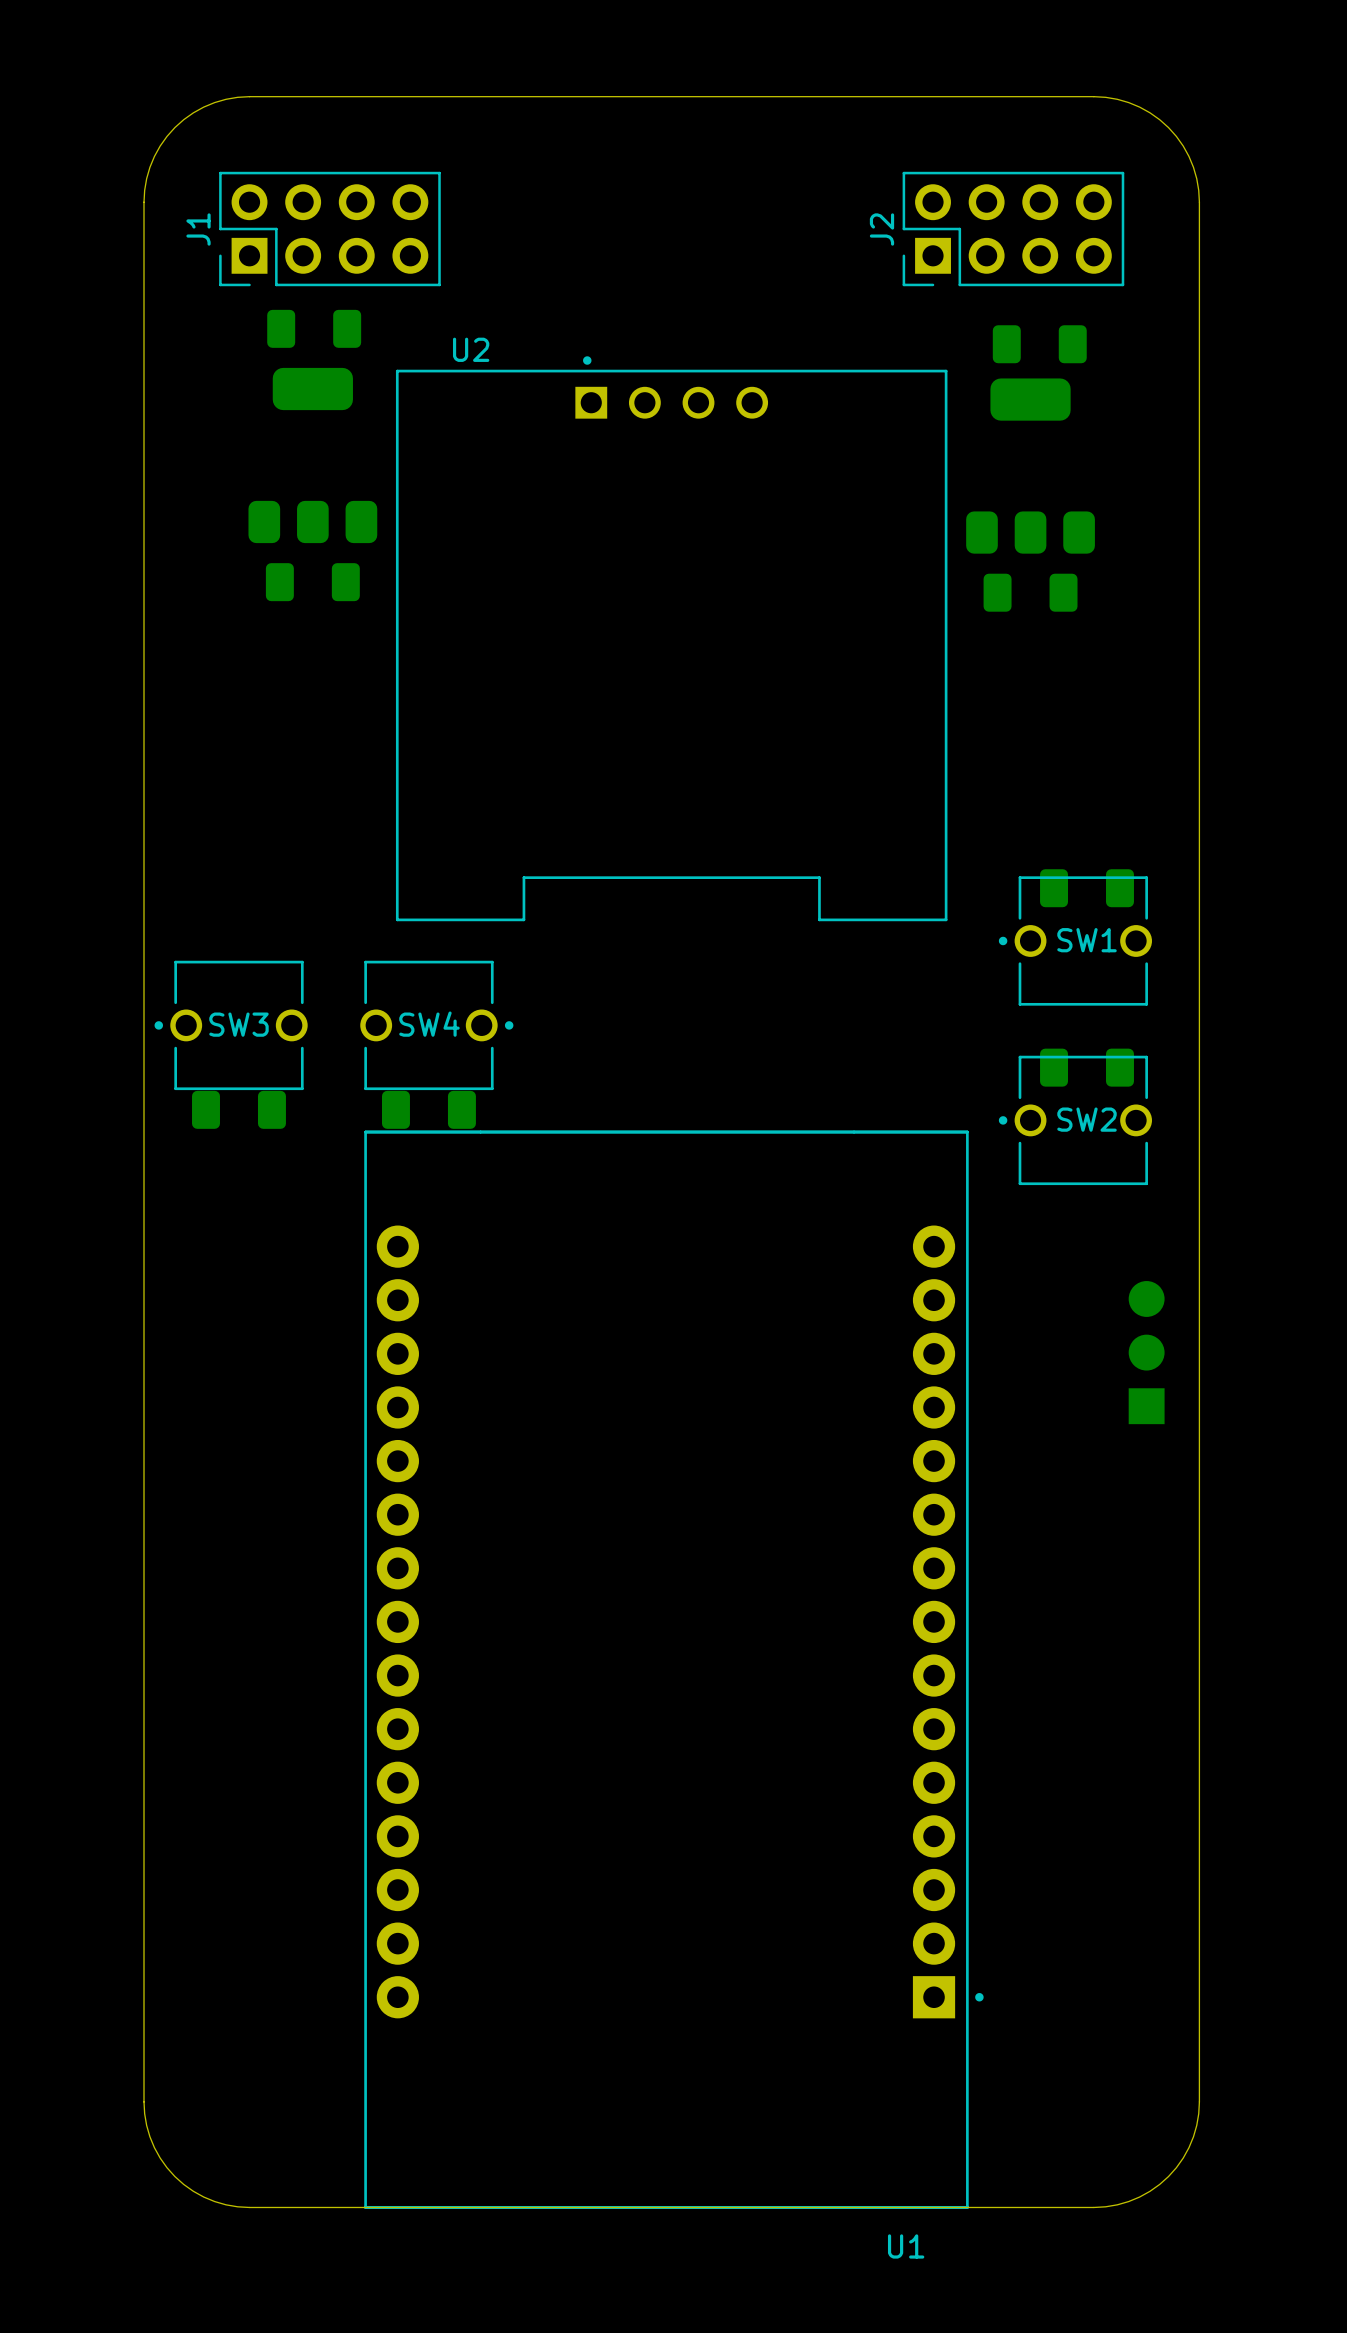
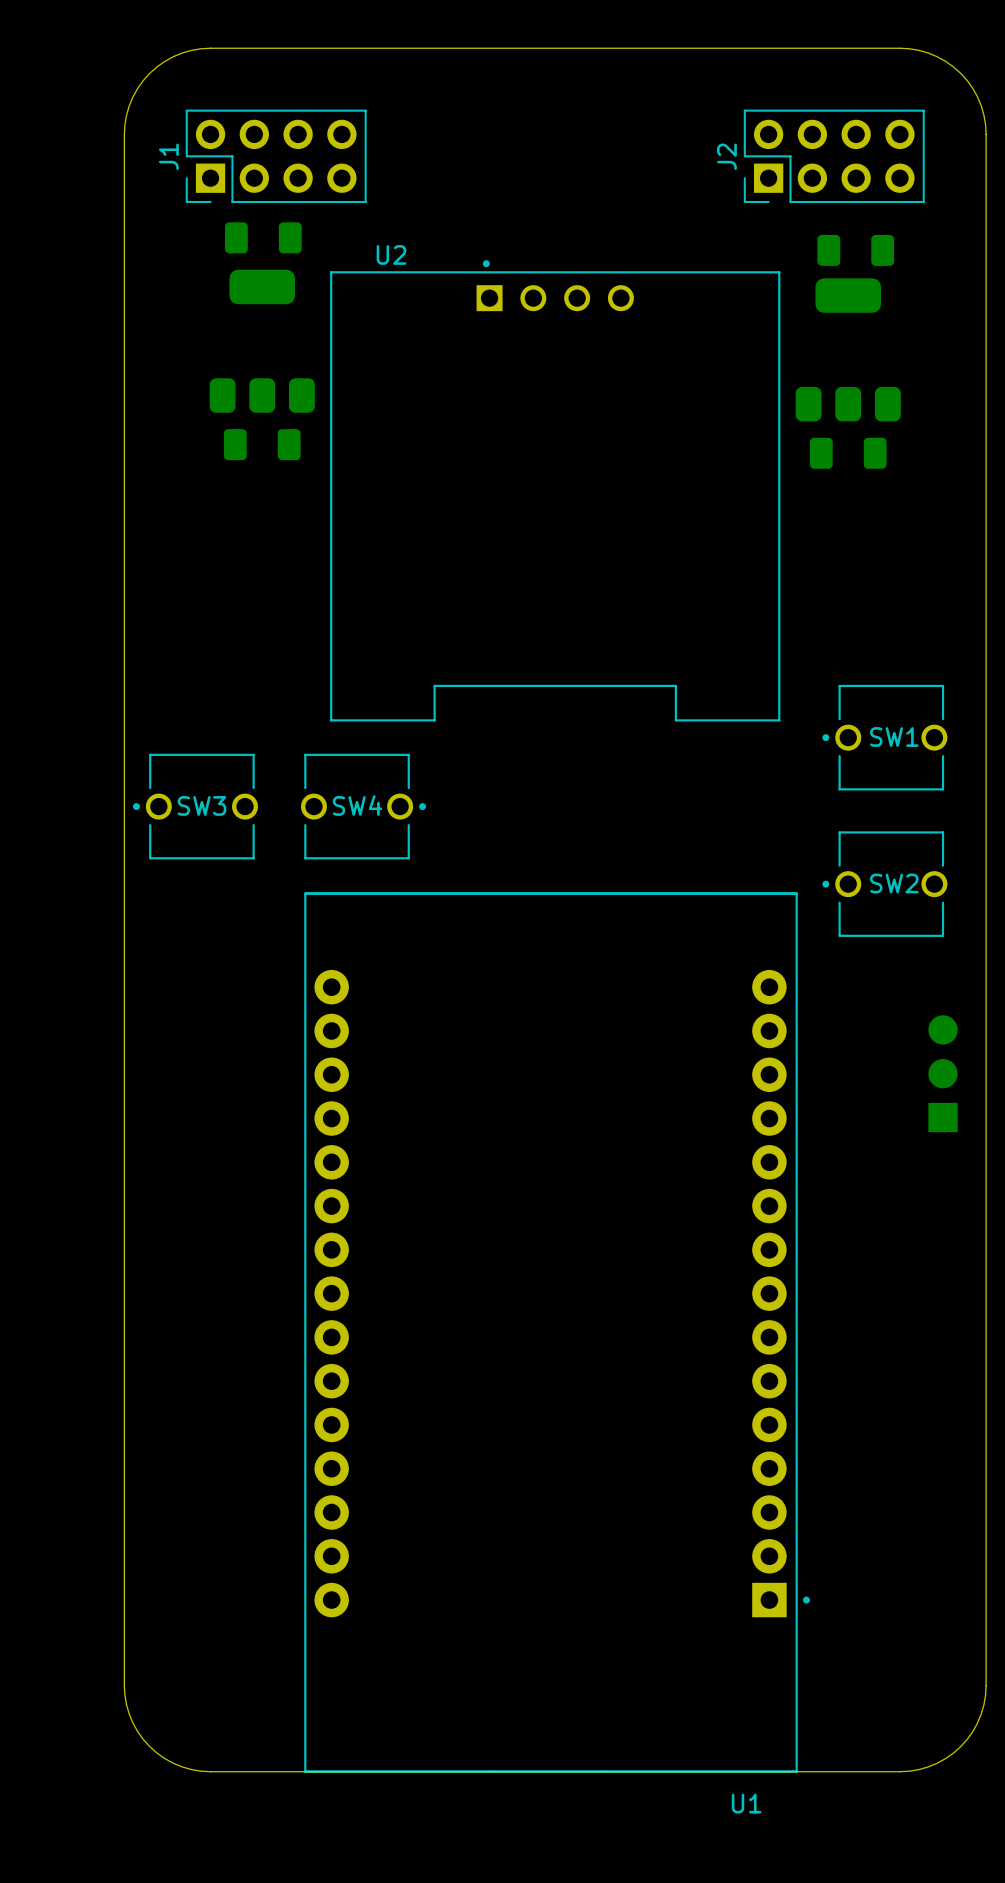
part: (1087, 888) -> none
part: (1087, 1067) -> none
part: (238, 1109) -> none
part: (428, 1109) -> none

